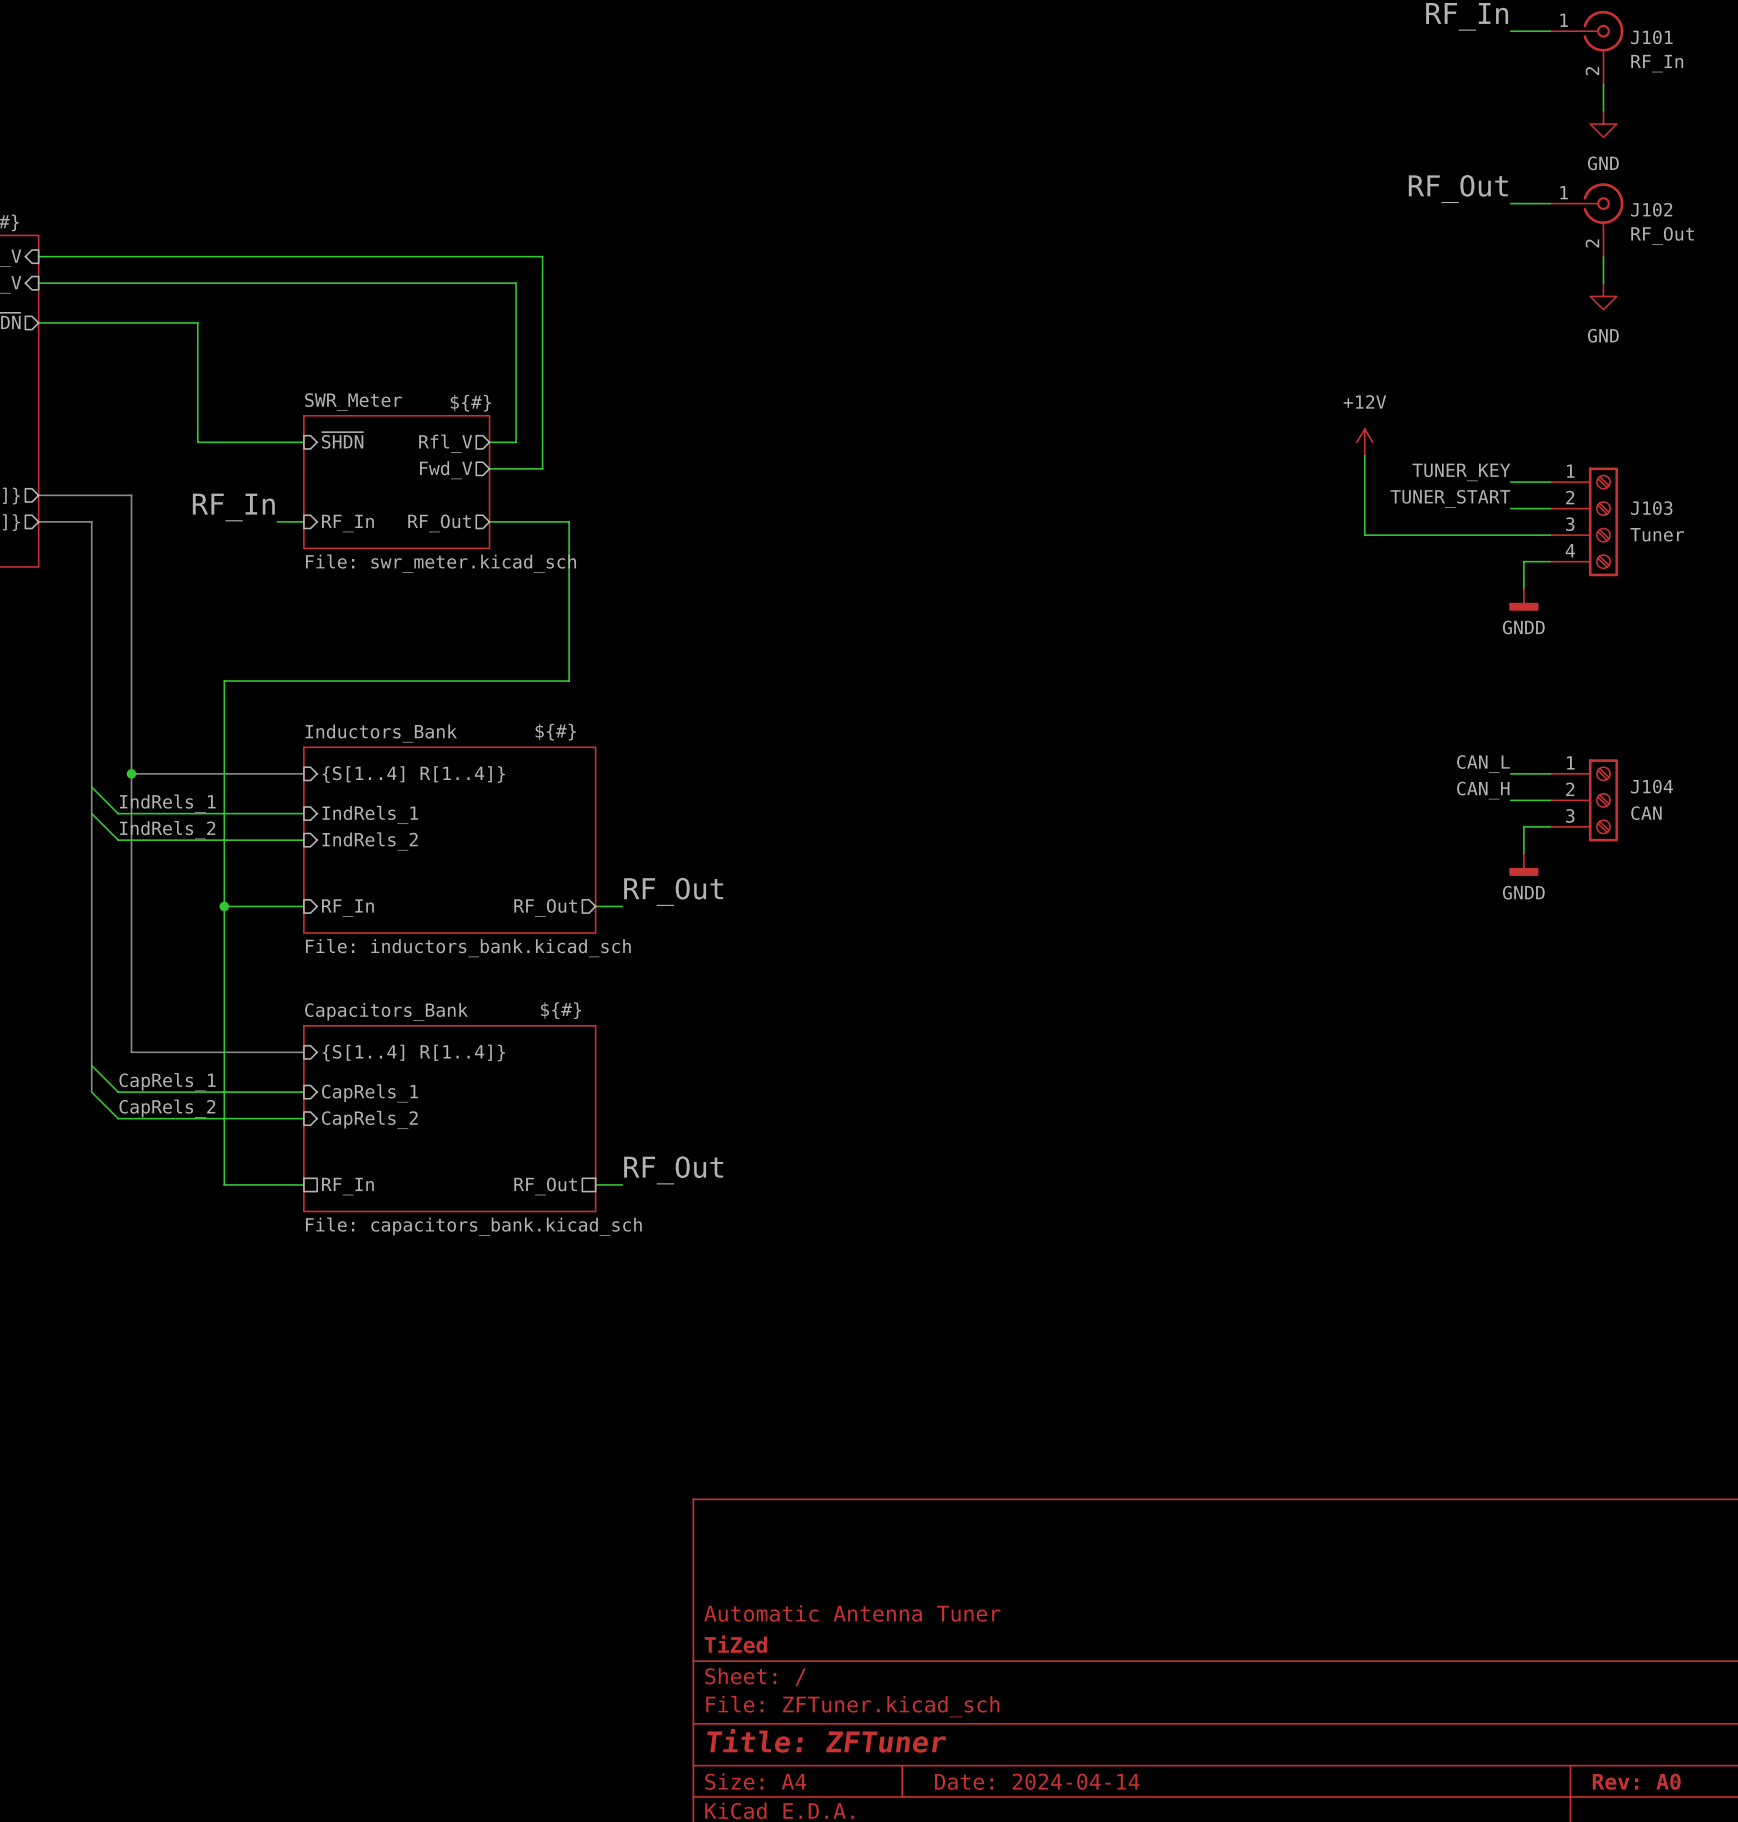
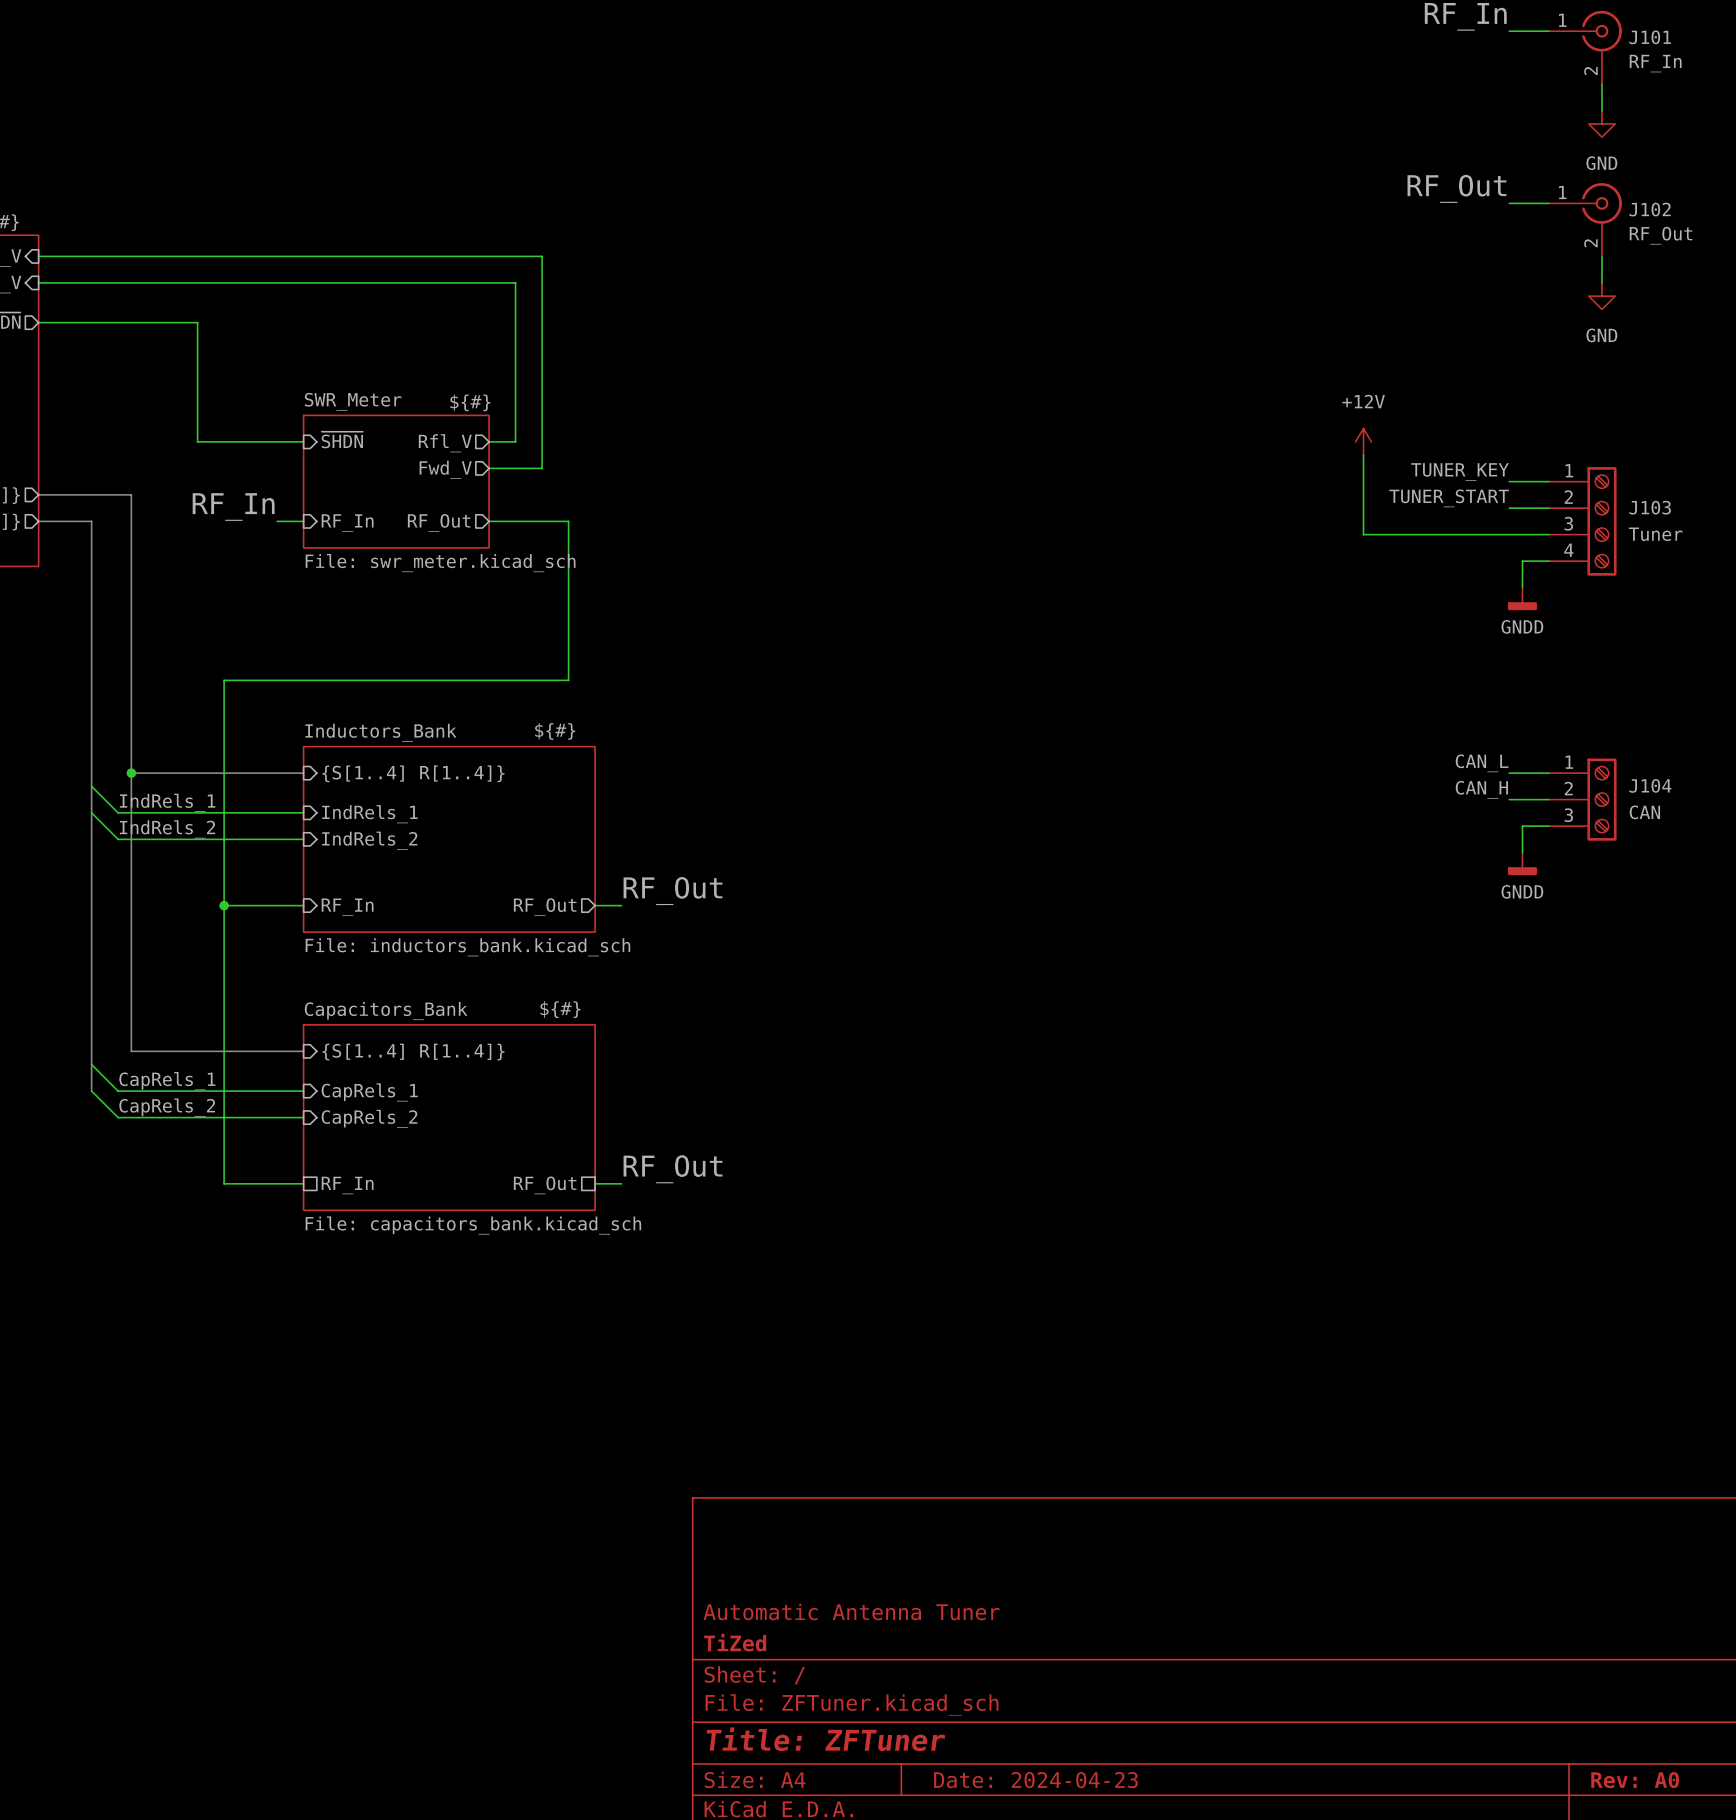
title block: Date: 2024-04-14 (1037, 1781) -> Date: 2024-04-23 (1035, 1780)

